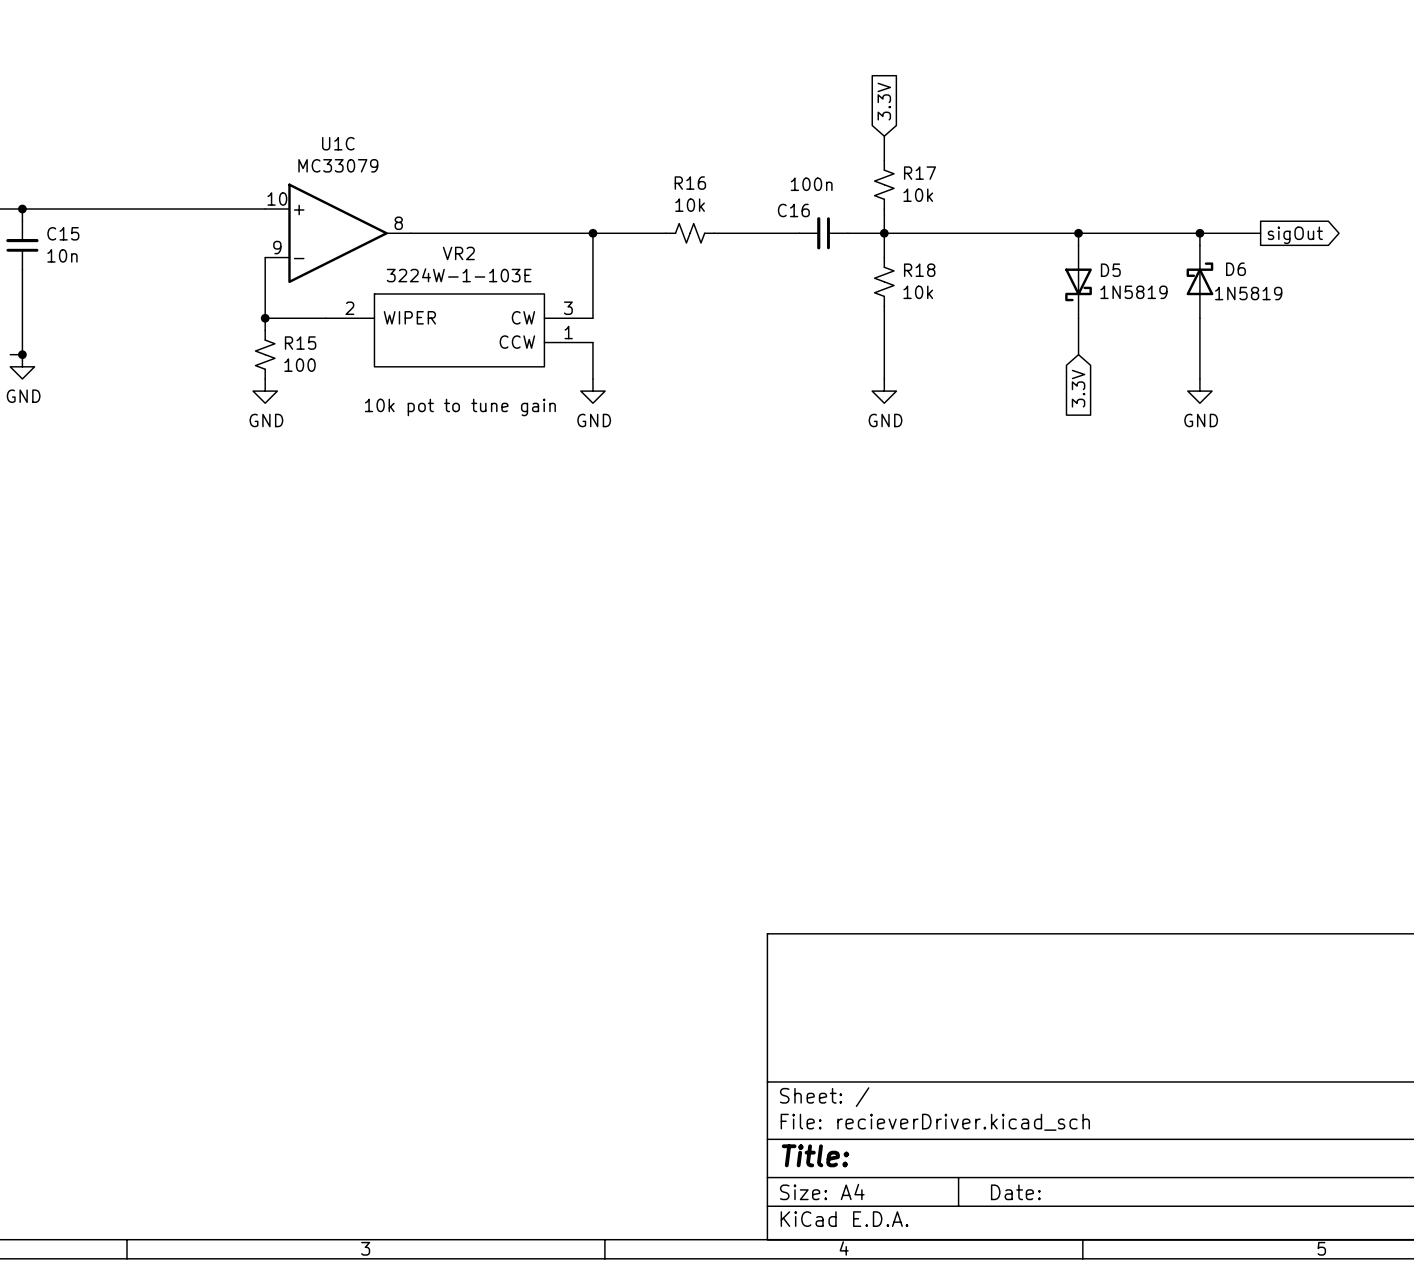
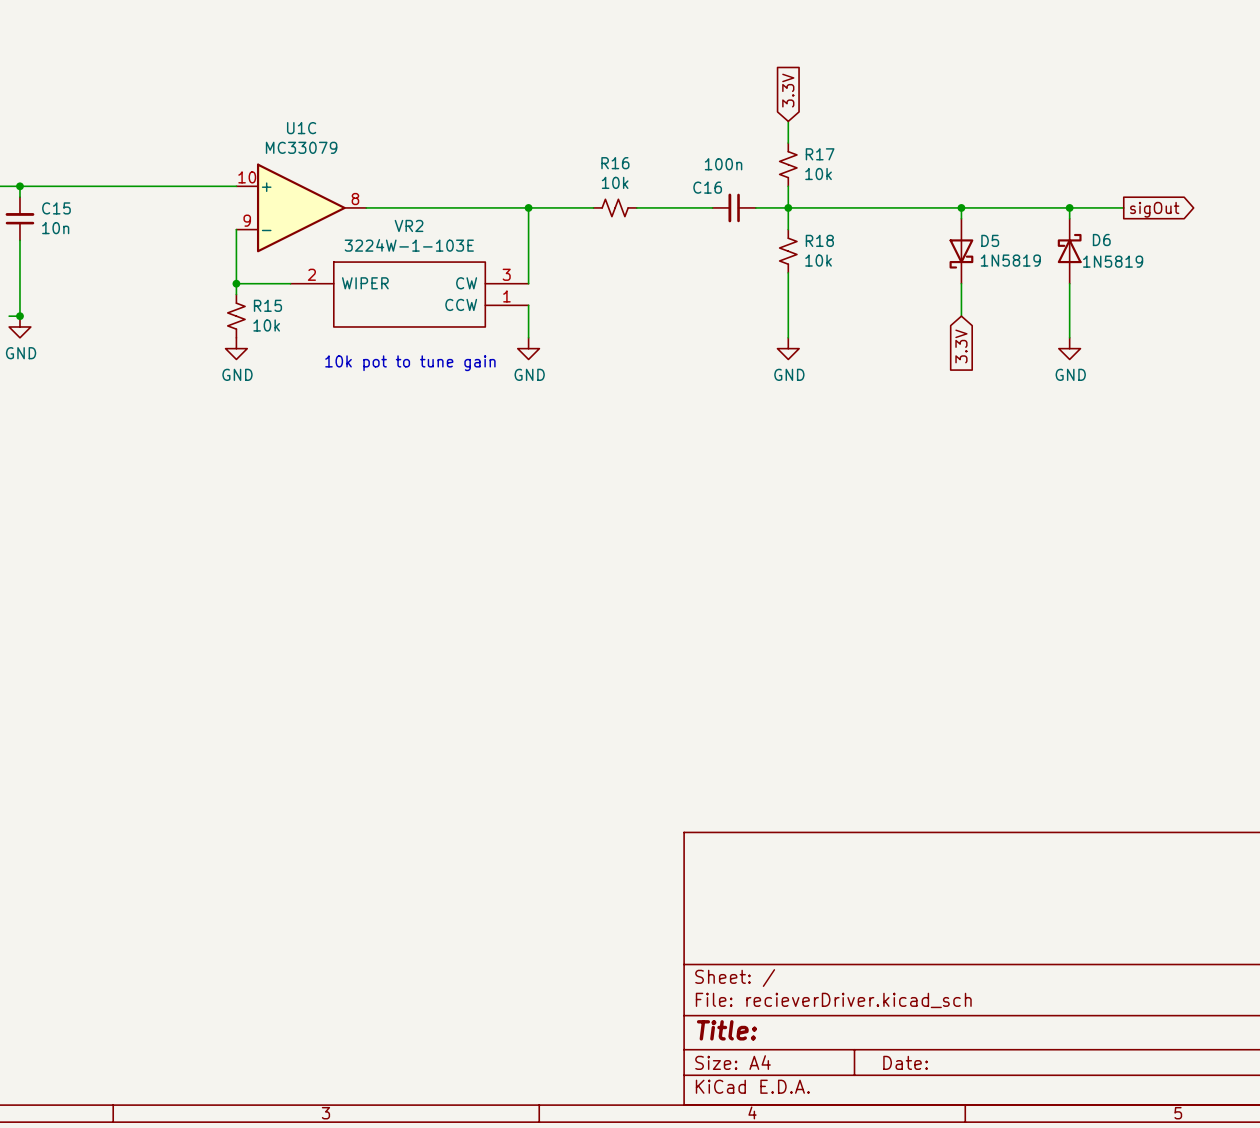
R15 value: 100 (300, 365) -> 10k (266, 325)

